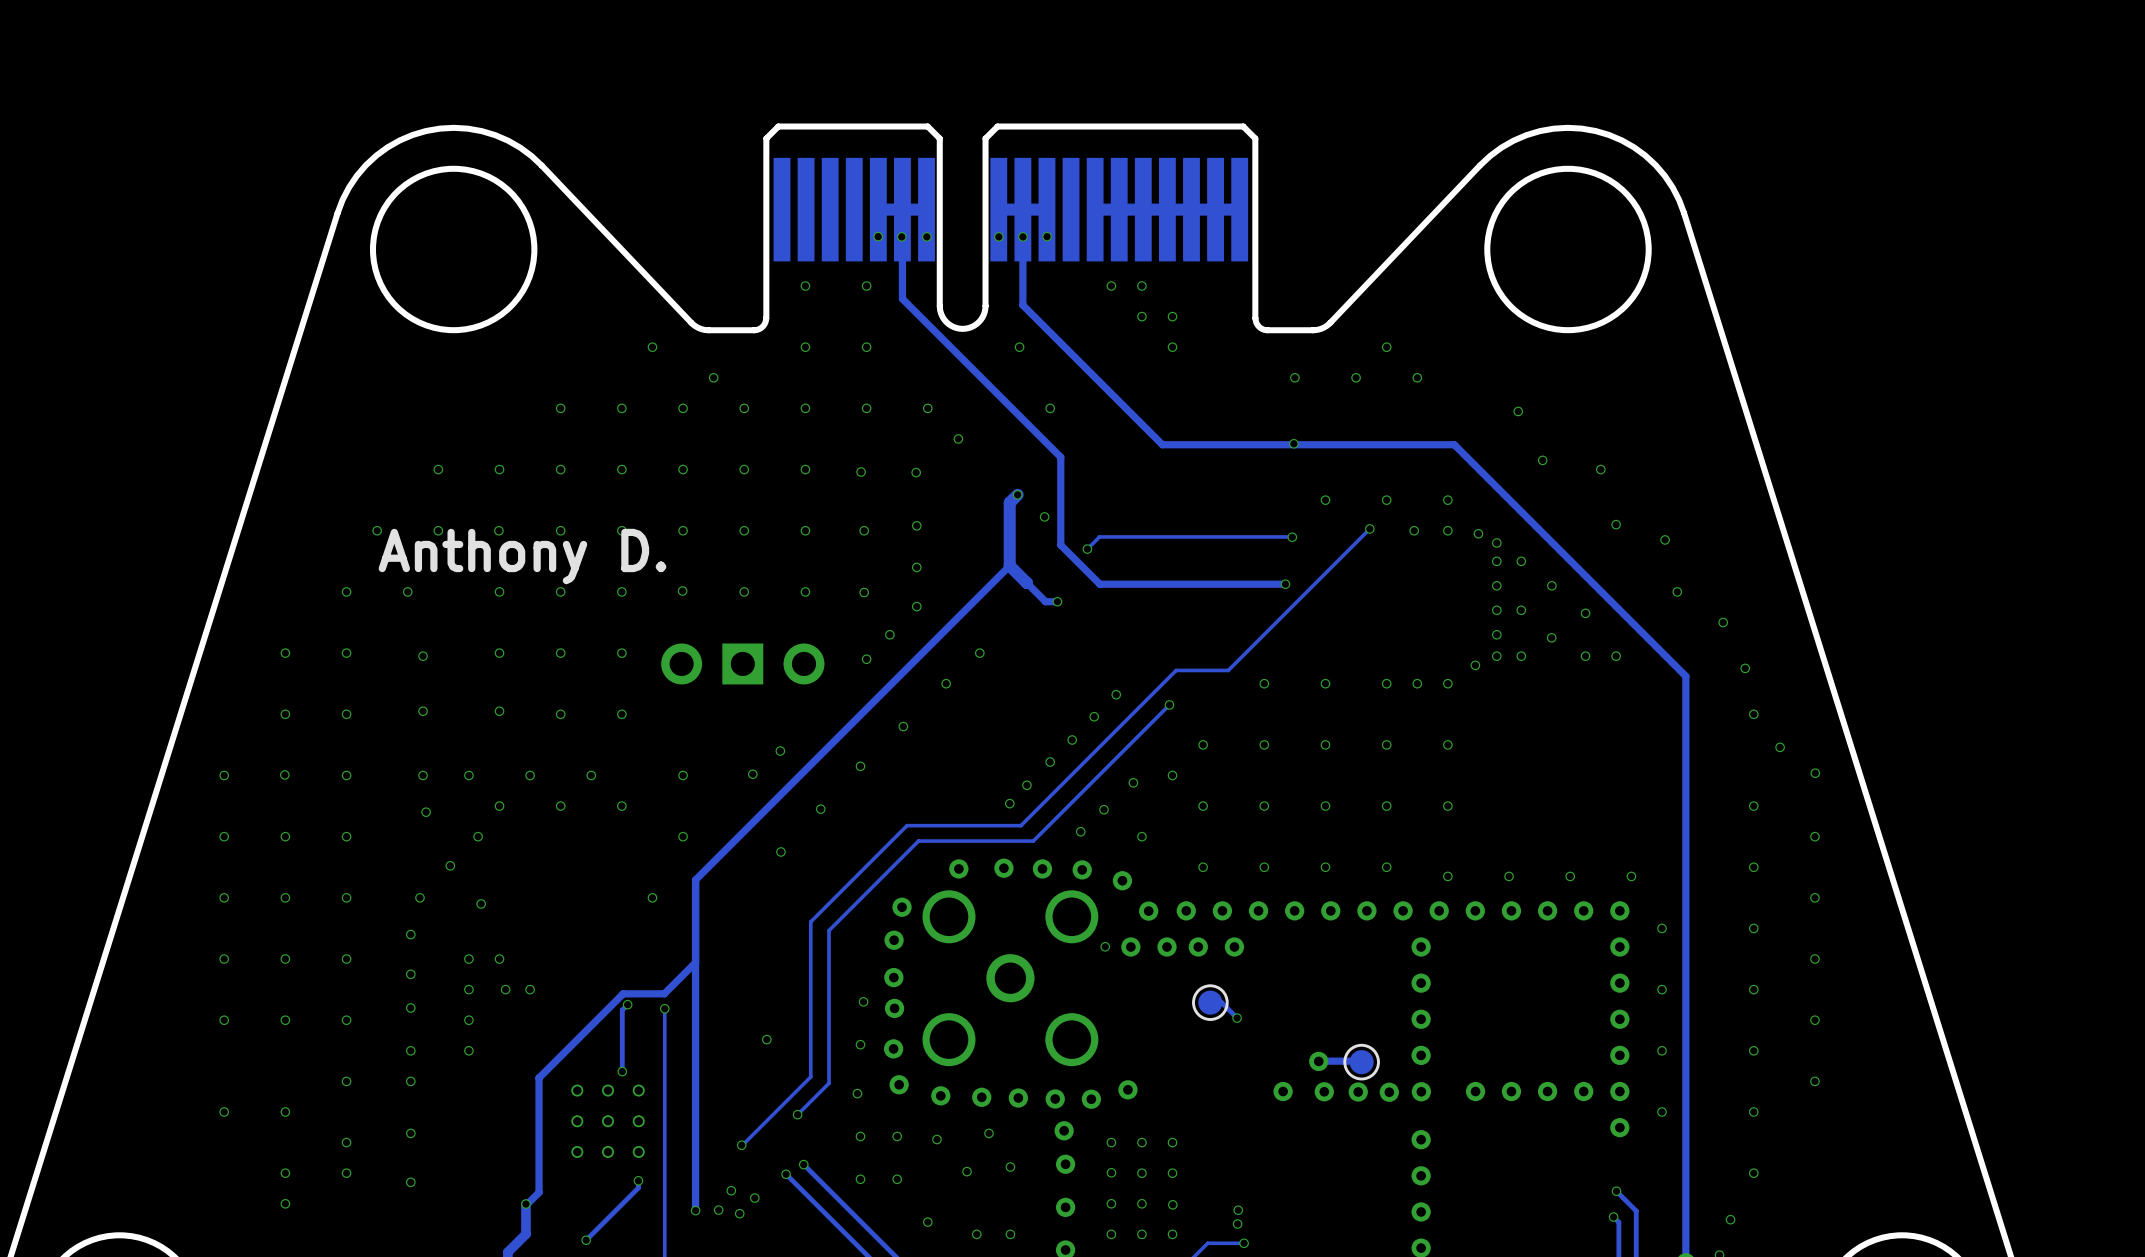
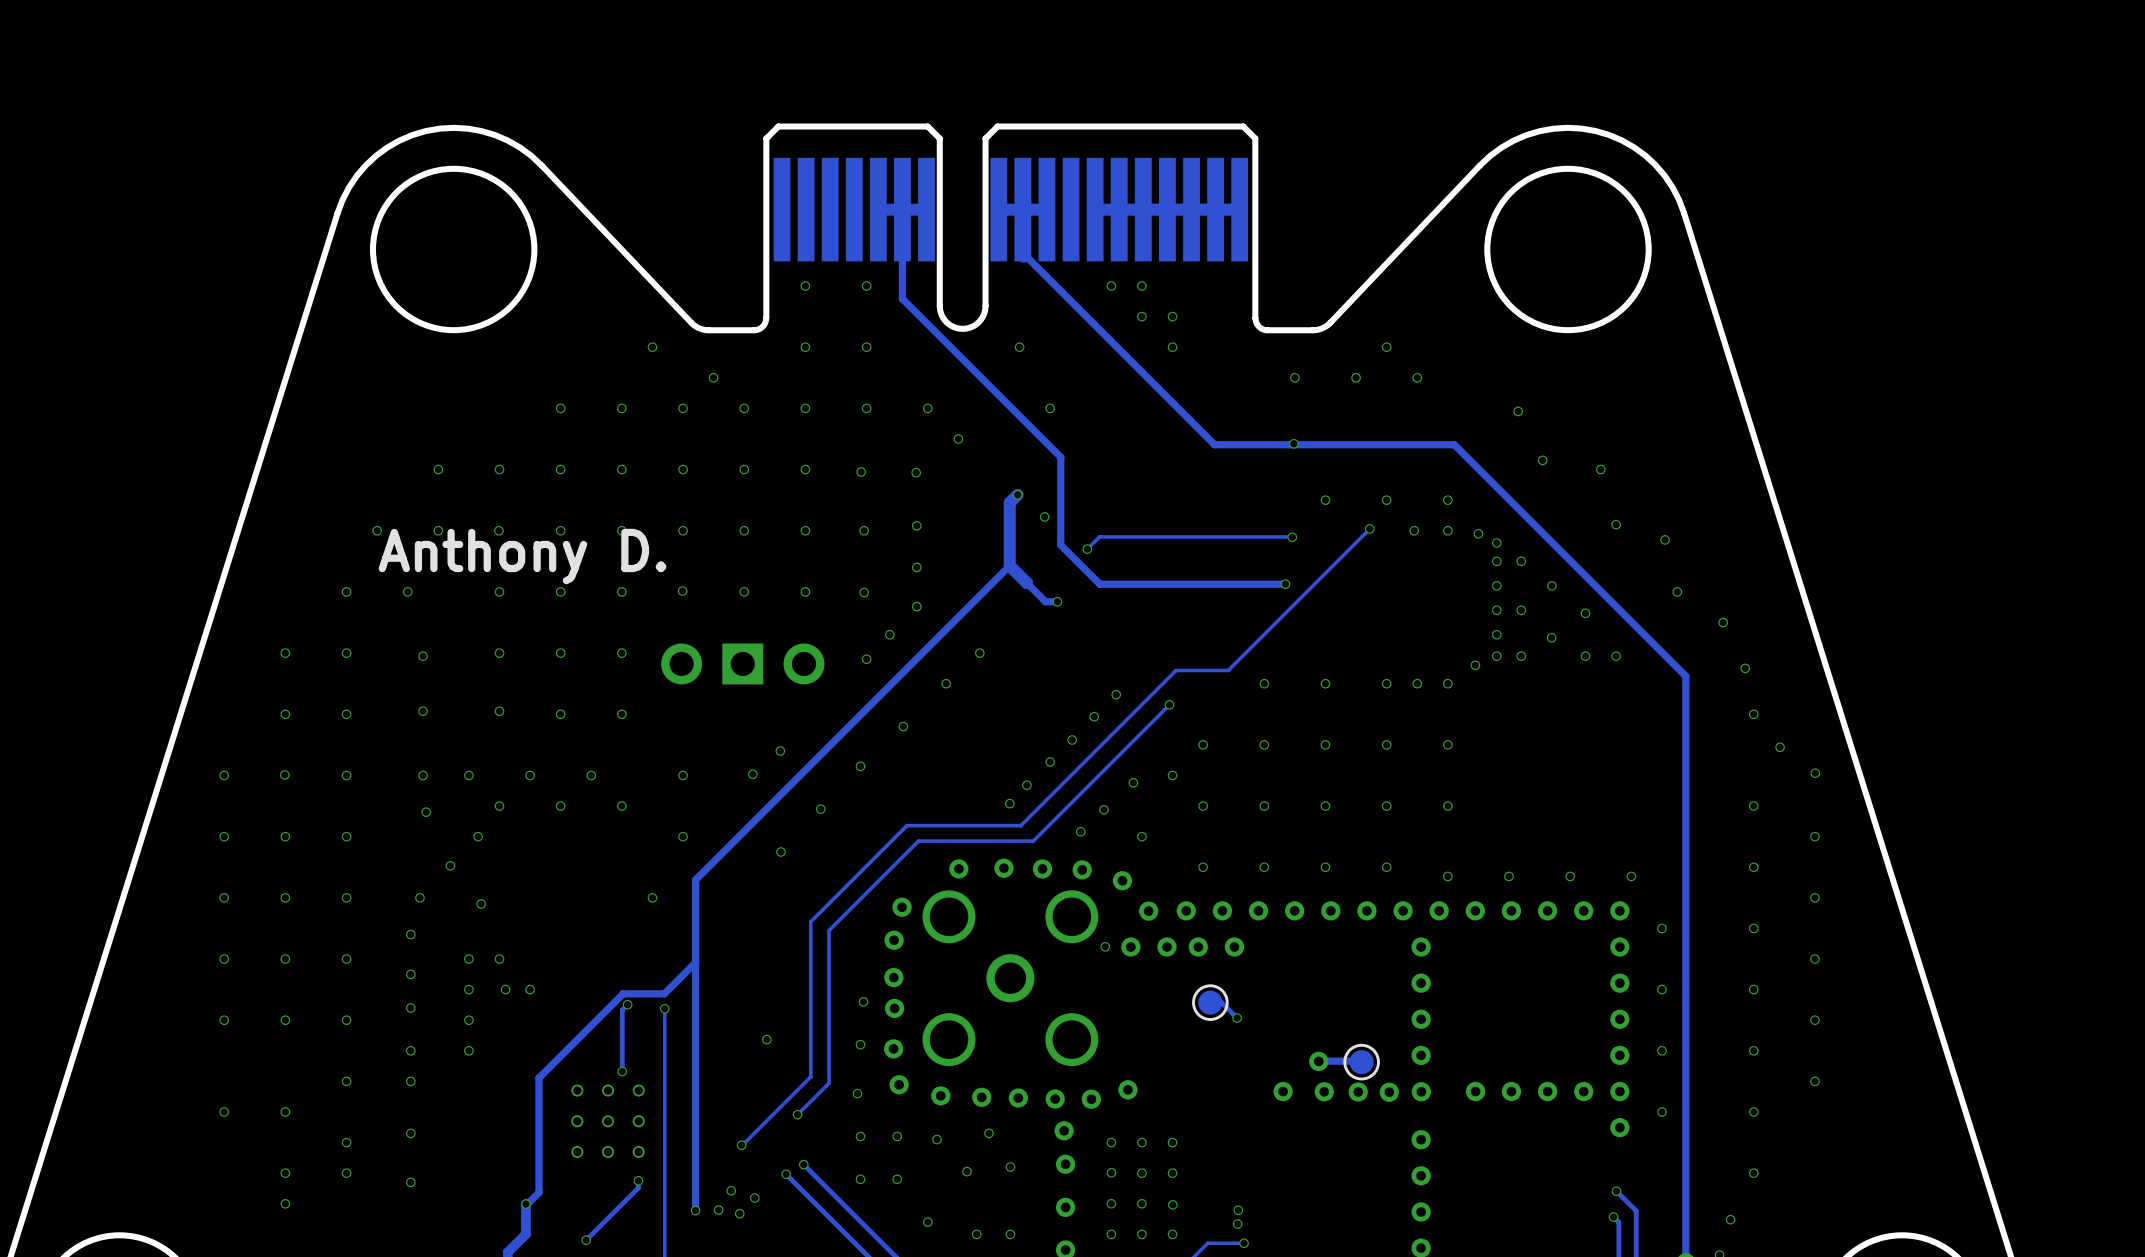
via: (878, 236) -> none
via: (901, 236) -> none
via: (926, 236) -> none
via: (998, 236) -> none
via: (1022, 236) -> none
via: (1047, 236) -> none
track: (1022, 252) (1022, 305) (1162, 444) (1214, 444) -> (1022, 252) (1214, 444)

